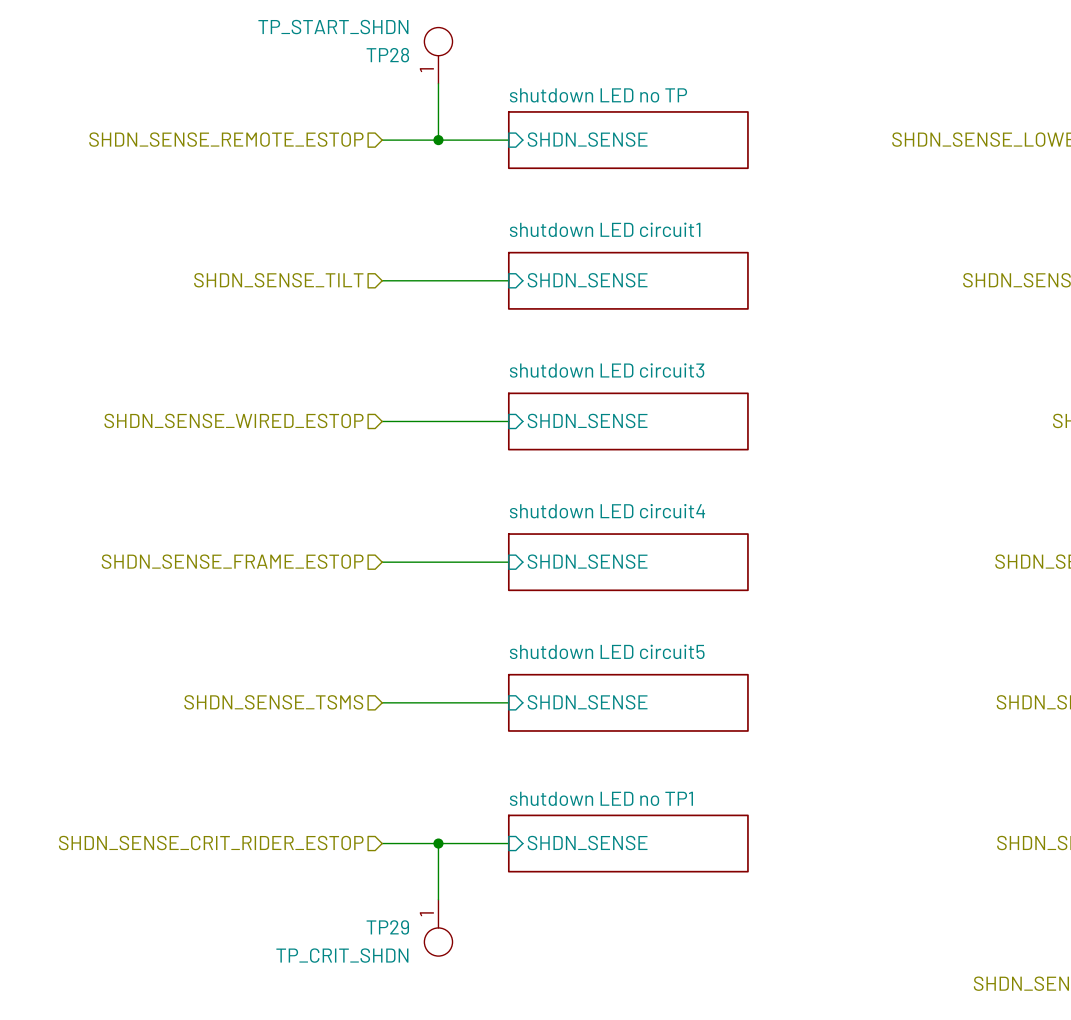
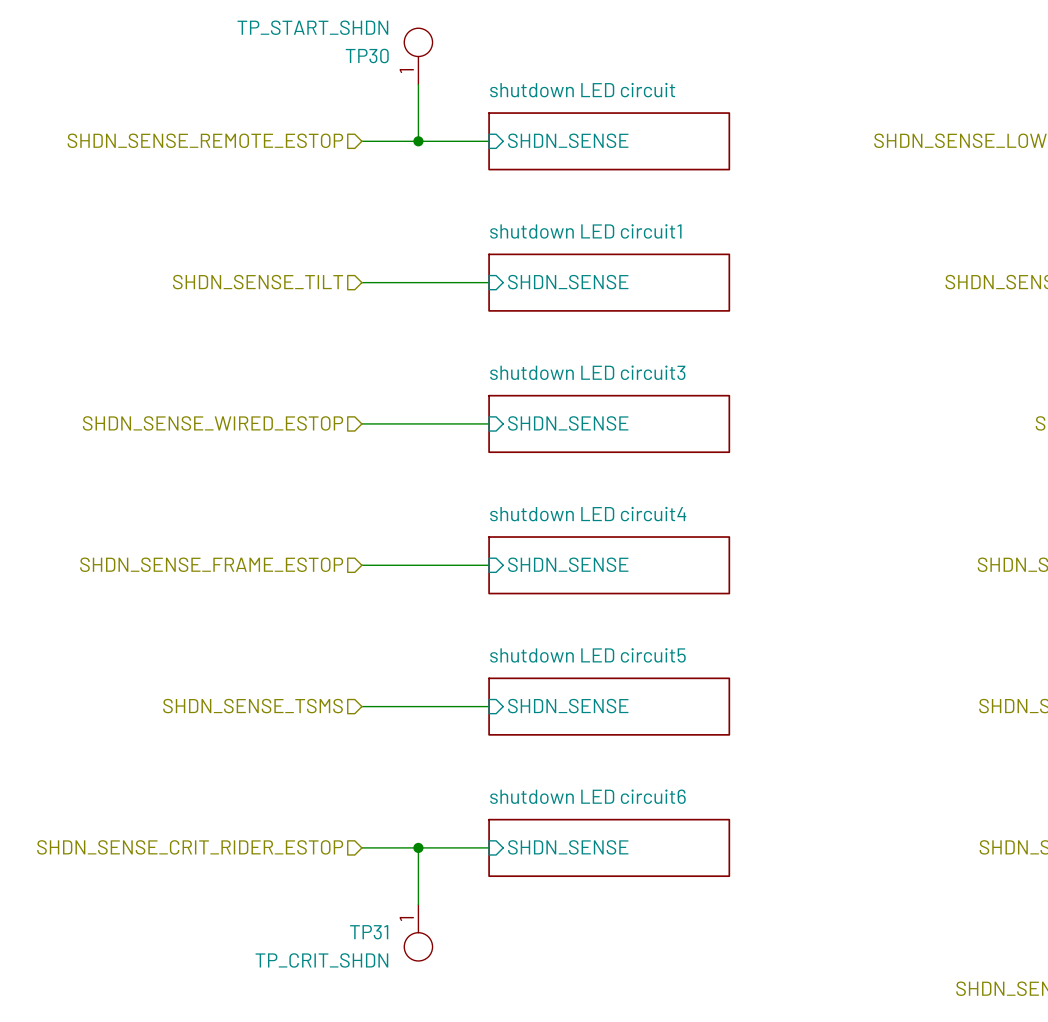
TP28 name: TP28 (387, 55) -> TP30 (367, 56)
sheet shutdown LED no TP name: shutdown LED no TP (598, 95) -> shutdown LED circuit (582, 90)
sheet shutdown LED no TP1 name: shutdown LED no TP1 (601, 798) -> shutdown LED circuit6 (587, 796)
TP29 name: TP29 (387, 927) -> TP31 (369, 932)

